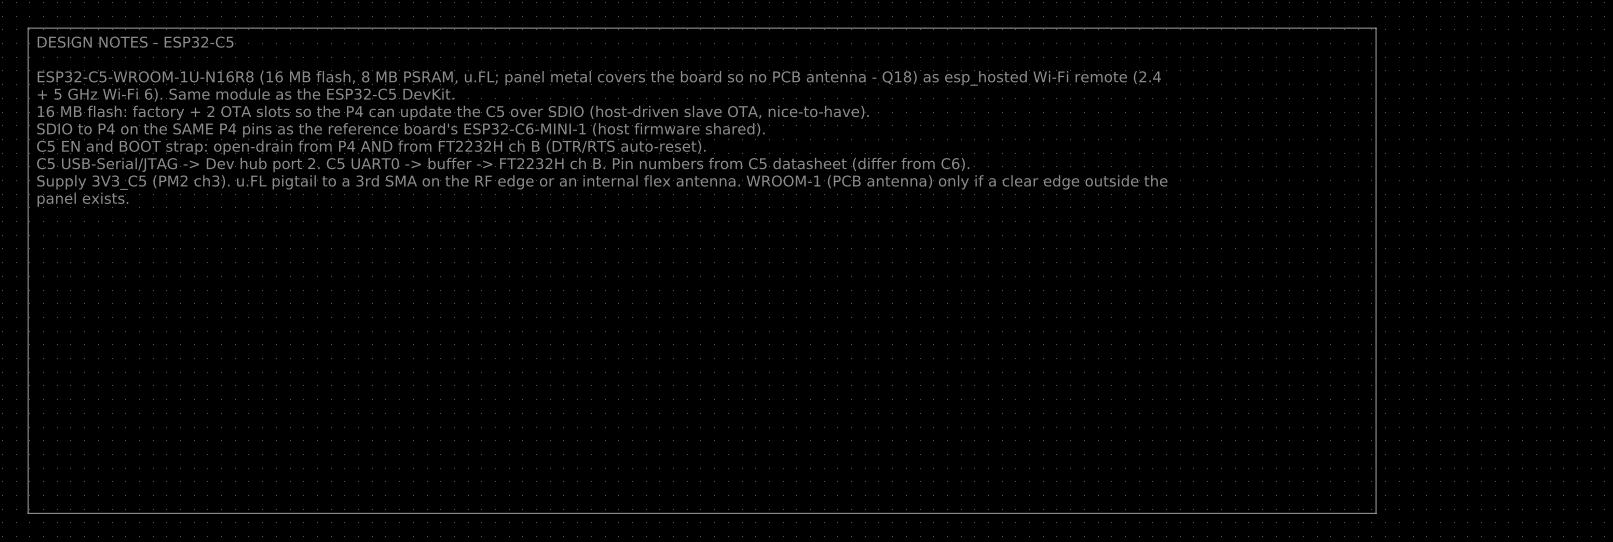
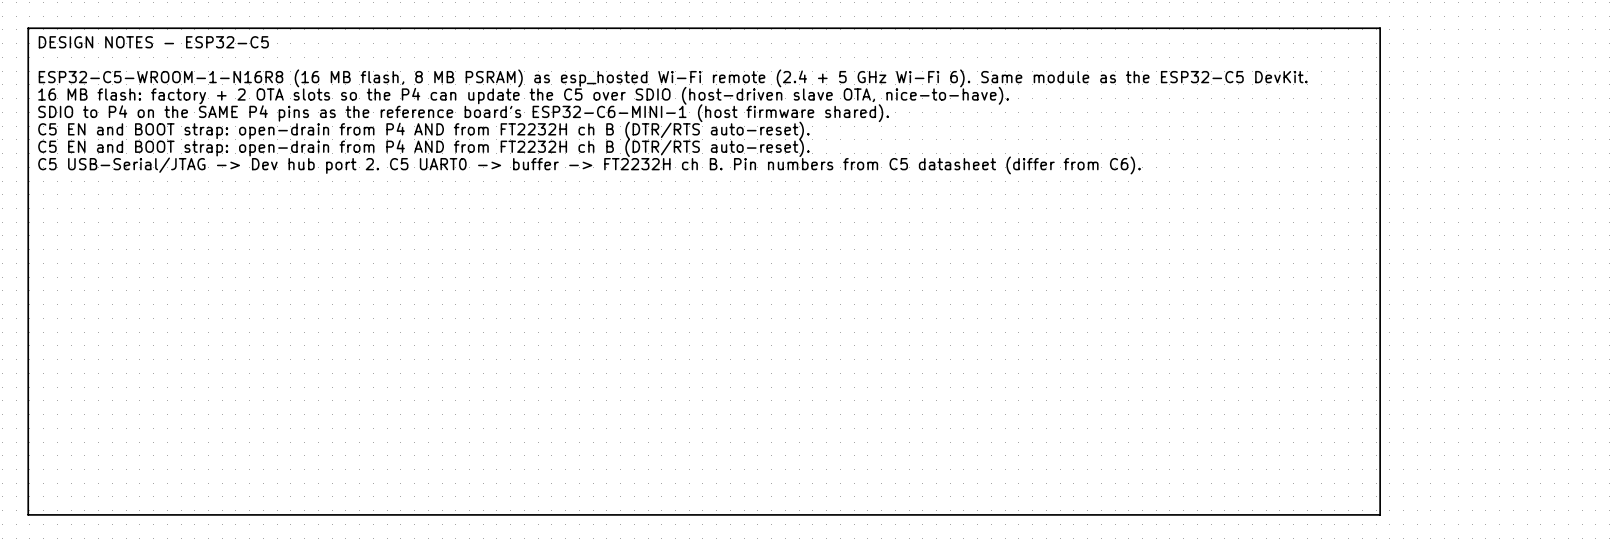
text: ESP32-C5-WROOM-1U-N16R8 (16 MB flash, 8 MB PSRAM, u.FL; panel metal covers the board so no PCB antenna - Q18) as esp_hosted Wi-Fi remote (2.4 (599, 78) -> ESP32-C5-WROOM-1-N16R8 (16 MB flash, 8 MB PSRAM) as esp_hosted Wi-Fi remote (2.4 + 5 GHz Wi-Fi 6). Same module as the ESP32-C5 DevKit. (673, 78)
text: + 5 GHz Wi-Fi 6). Same module as the ESP32-C5 DevKit. (245, 94) -> 16 MB flash: factory + 2 OTA slots so the P4 can update the C5 over SDIO (host-driven slave OTA, nice-to-have). (523, 95)
text: 16 MB flash: factory + 2 OTA slots so the P4 can update the C5 over SDIO (host-driven slave OTA, nice-to-have). (453, 112) -> SDIO to P4 on the SAME P4 pins as the reference board's ESP32-C6-MINI-1 (host firmware shared). (463, 113)
text: SDIO to P4 on the SAME P4 pins as the reference board's ESP32-C6-MINI-1 (host firmware shared). (400, 130) -> C5 EN and BOOT strap: open-drain from P4 AND from FT2232H ch B (DTR/RTS auto-reset). (423, 130)
text: Supply 3V3_C5 (PM2 ch3). u.FL pigtail to a 3rd SMA on the RF edge or an internal flex antenna. WROOM-1 (PCB antenna) only if a clear edge outside the (602, 182) -> none
text: panel exists. (82, 199) -> none

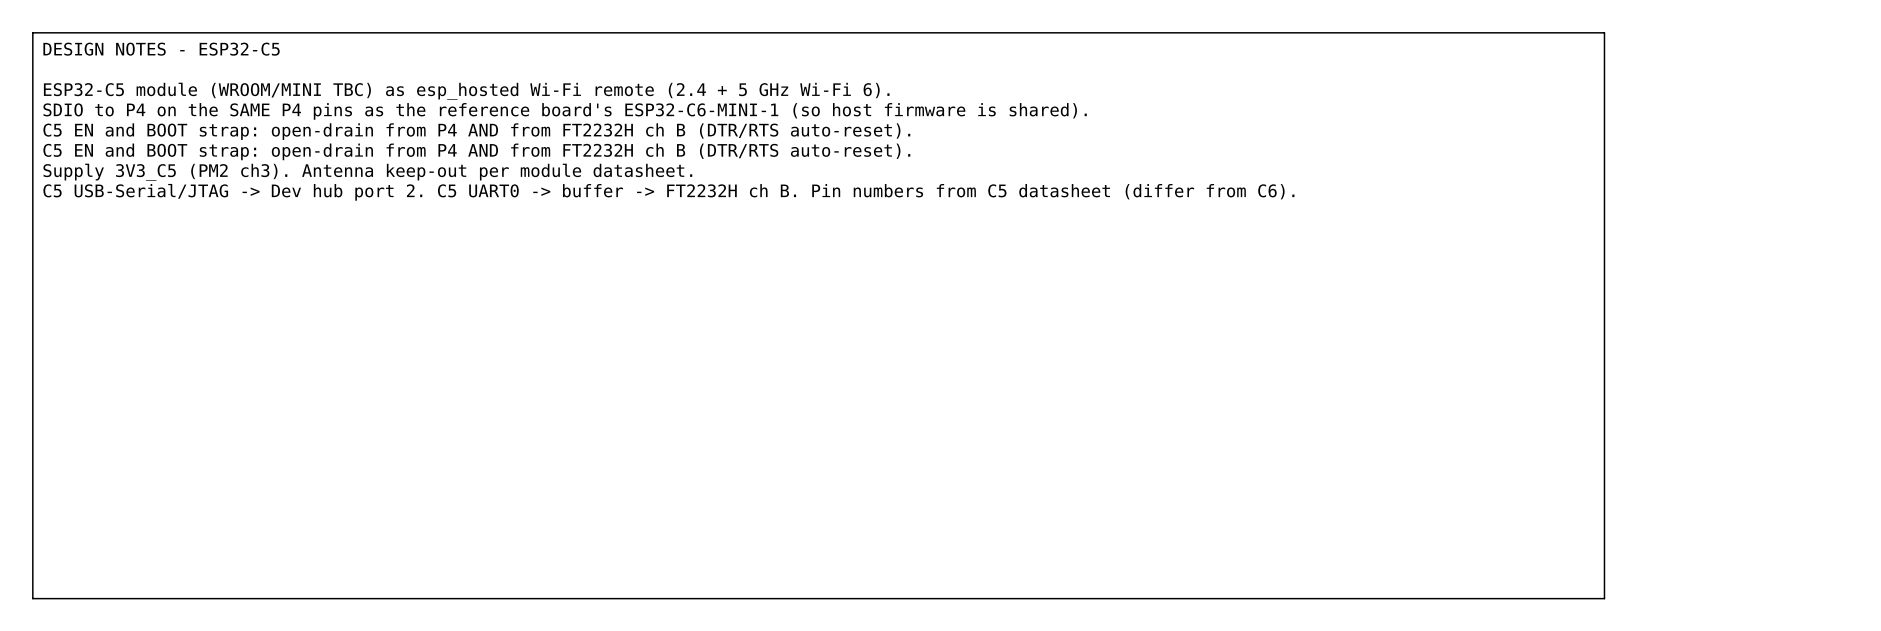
text: ESP32-C5-WROOM-1-N16R8 (16 MB flash, 8 MB PSRAM) as esp_hosted Wi-Fi remote (2.4 + 5 GHz Wi-Fi 6). Same module as the ESP32-C5 DevKit. (673, 78) -> ESP32-C5 module (WROOM/MINI TBC) as esp_hosted Wi-Fi remote (2.4 + 5 GHz Wi-Fi 6). (466, 91)
text: 16 MB flash: factory + 2 OTA slots so the P4 can update the C5 over SDIO (host-driven slave OTA, nice-to-have). (523, 95) -> SDIO to P4 on the SAME P4 pins as the reference board's ESP32-C6-MINI-1 (so host firmware is shared). (565, 111)
text: SDIO to P4 on the SAME P4 pins as the reference board's ESP32-C6-MINI-1 (host firmware shared). (463, 113) -> C5 EN and BOOT strap: open-drain from P4 AND from FT2232H ch B (DTR/RTS auto-reset). (476, 131)
text: C5 EN and BOOT strap: open-drain from P4 AND from FT2232H ch B (DTR/RTS auto-reset). (423, 148) -> Supply 3V3_C5 (PM2 ch3). Antenna keep-out per module datasheet. (367, 172)

